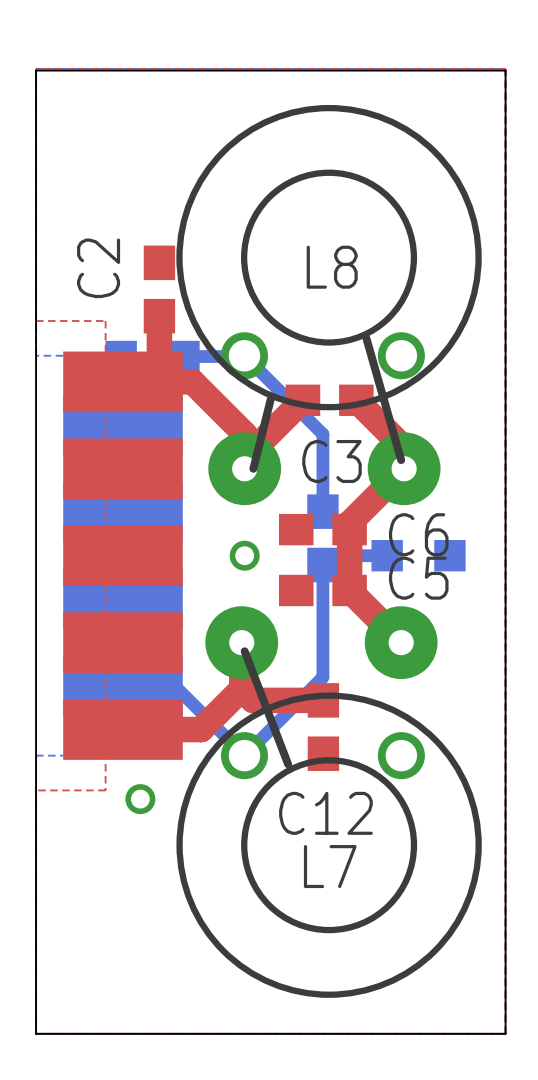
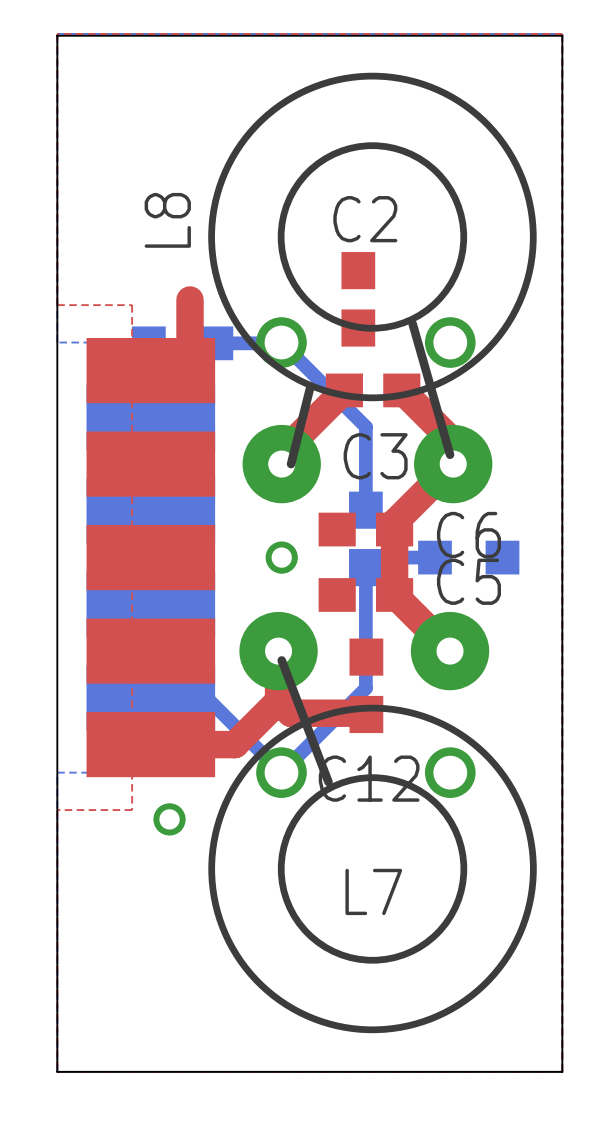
L8 name rotation: 0° (332, 267) -> 90° counterclockwise (167, 220)
L8 name position: L8 (332, 267) -> L8 (167, 220)
C2 name rotation: 0° (98, 268) -> 90° clockwise (365, 219)
C2 name position: C2 (98, 268) -> C2 (365, 219)
C2 position: (159, 289) -> (358, 299)
top track: (126, 377) (122, 381) (192, 381) (244, 434) (244, 458) -> none
C12 position: (323, 727) -> (366, 685)

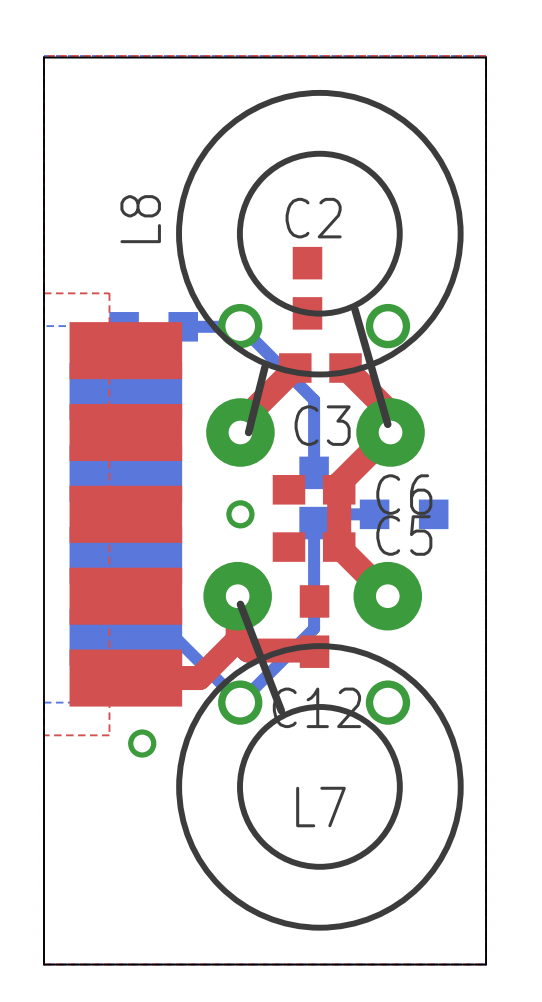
top track: (190, 299) (190, 368) (188, 370) -> none

